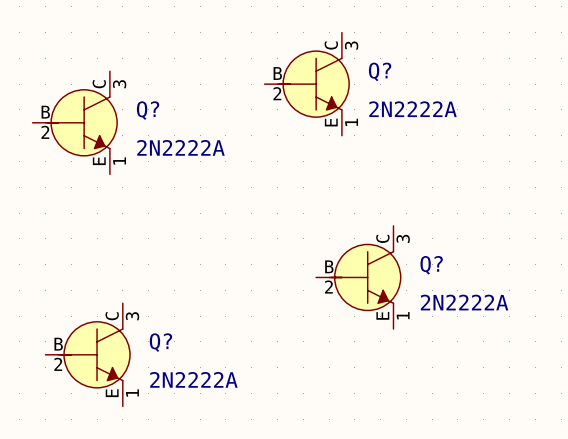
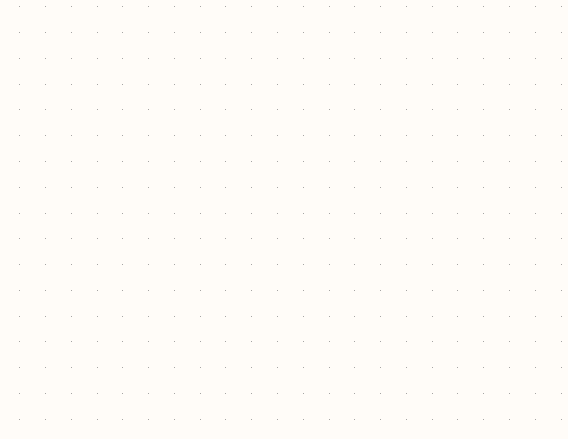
Q?: 2N2222A (306, 84) -> none
Q?: 2N2222A (74, 122) -> none
Q?: 2N2222A (358, 277) -> none
Q?: 2N2222A (87, 354) -> none

